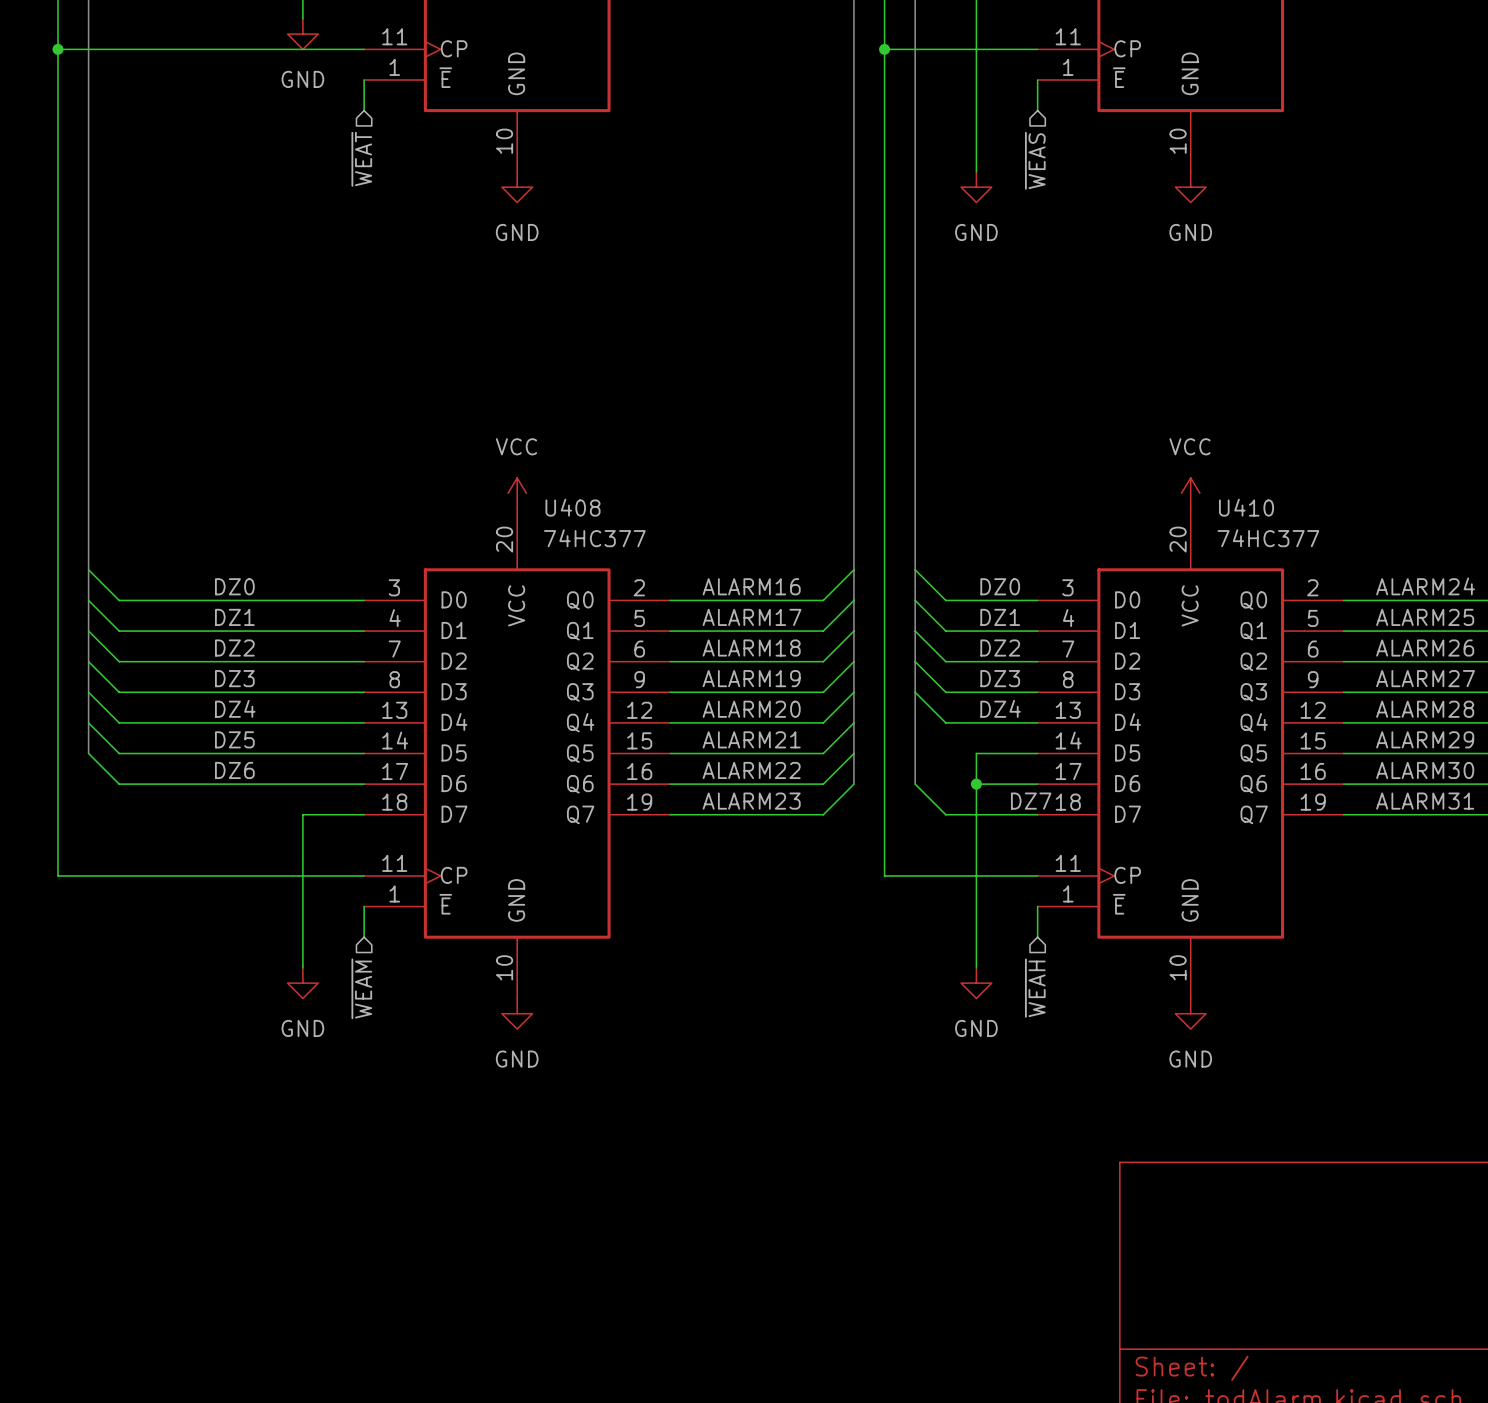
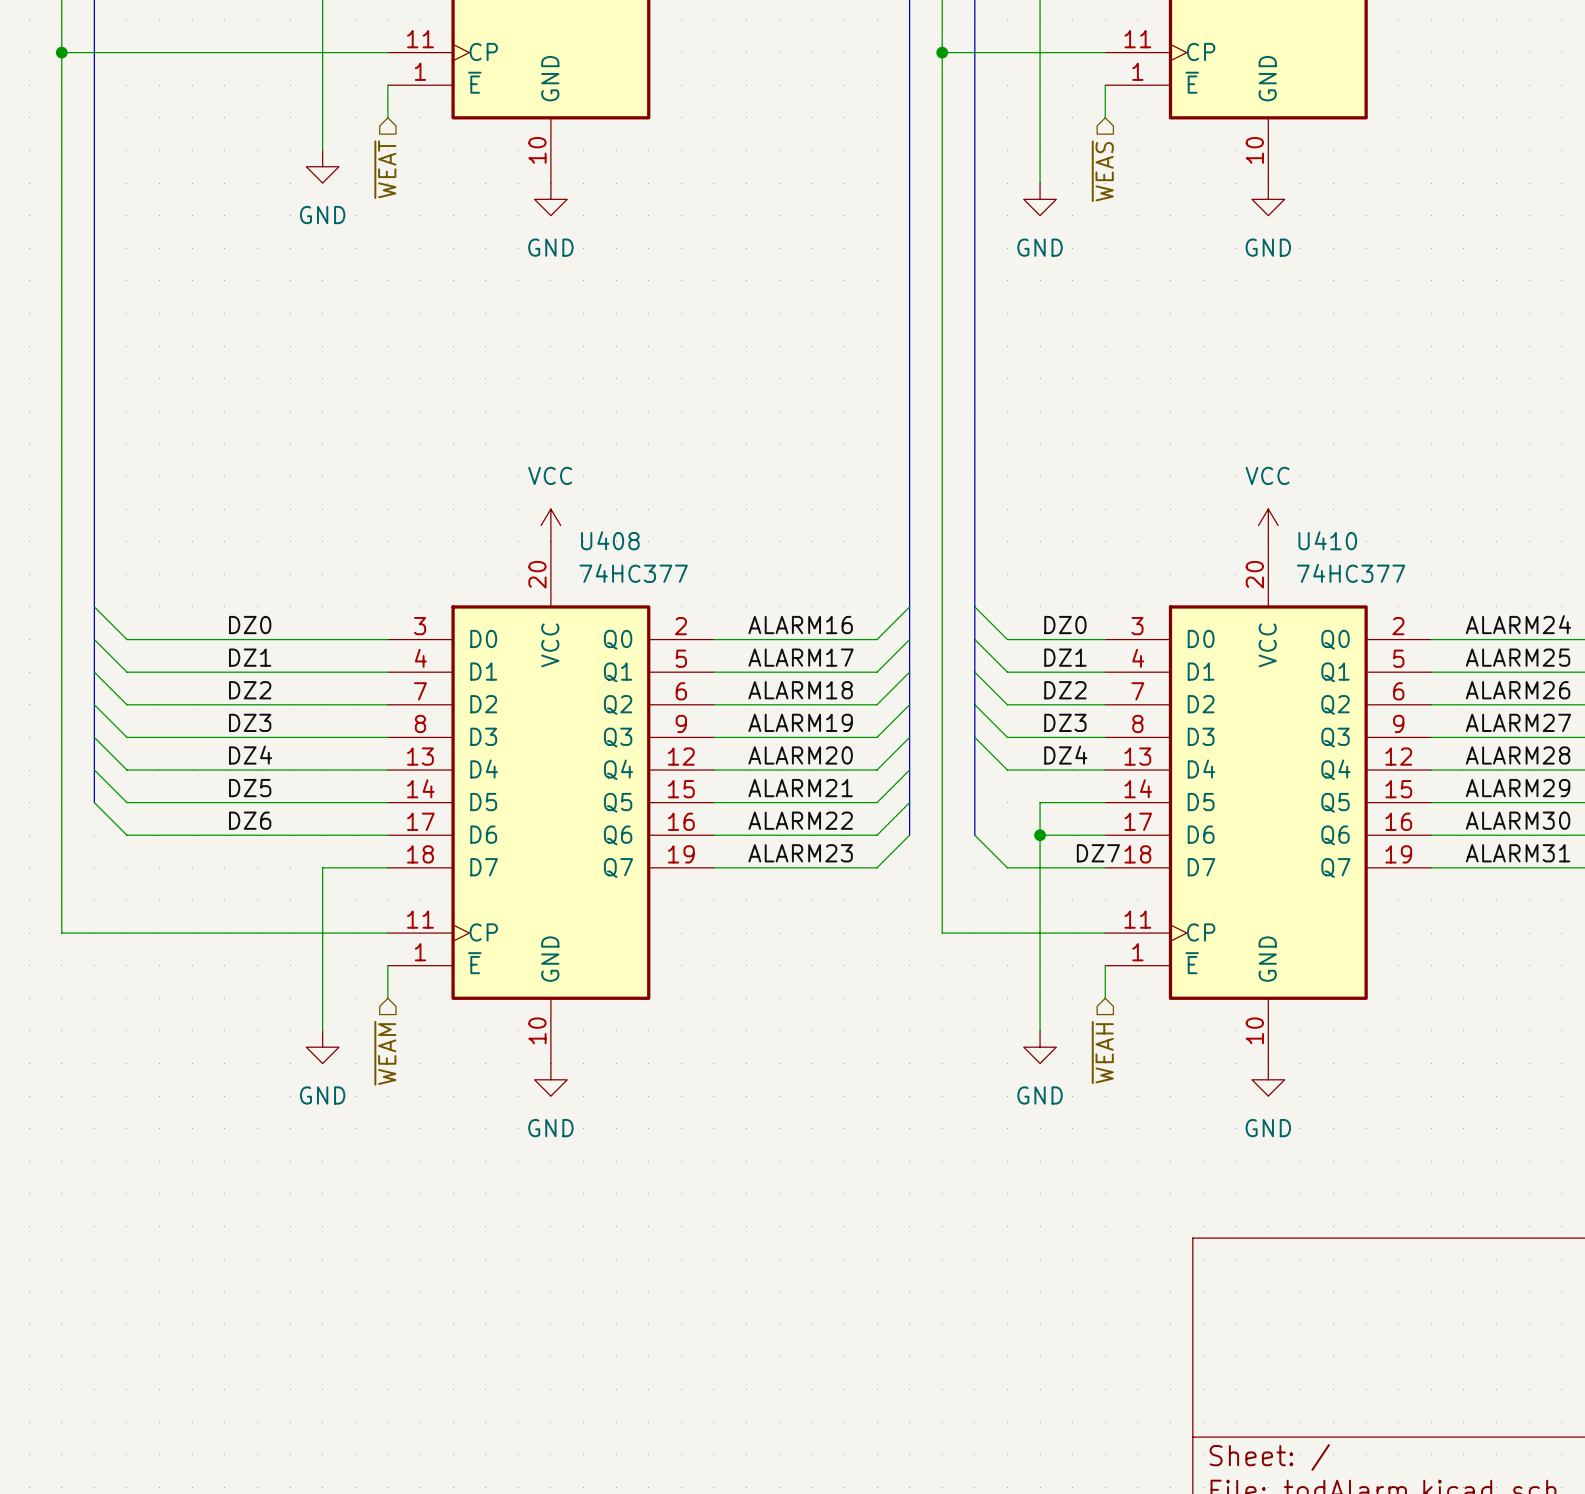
wire: none -> (322, 19) (322, 150)
power symbol position: GND (302, 34) -> GND (322, 166)

